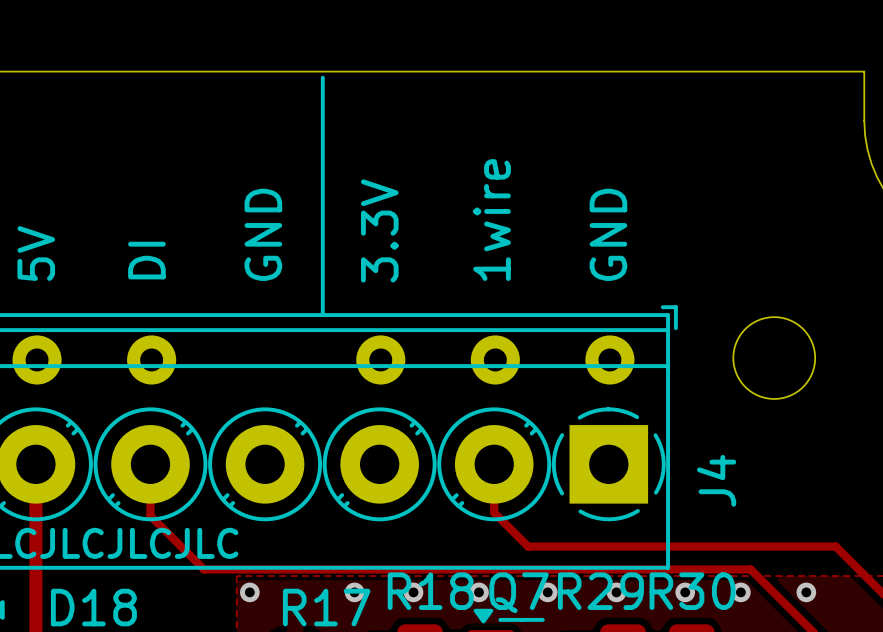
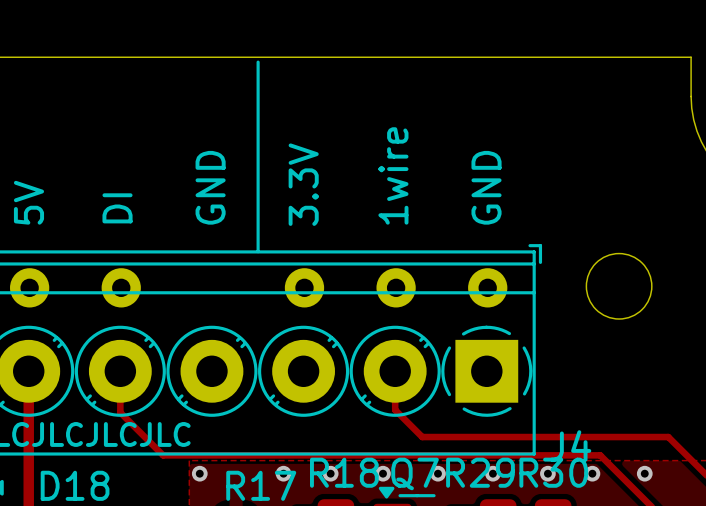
J4 name rotation: 0° (716, 480) -> 90° clockwise (570, 445)
J4 name position: J4 (716, 480) -> J4 (570, 445)

